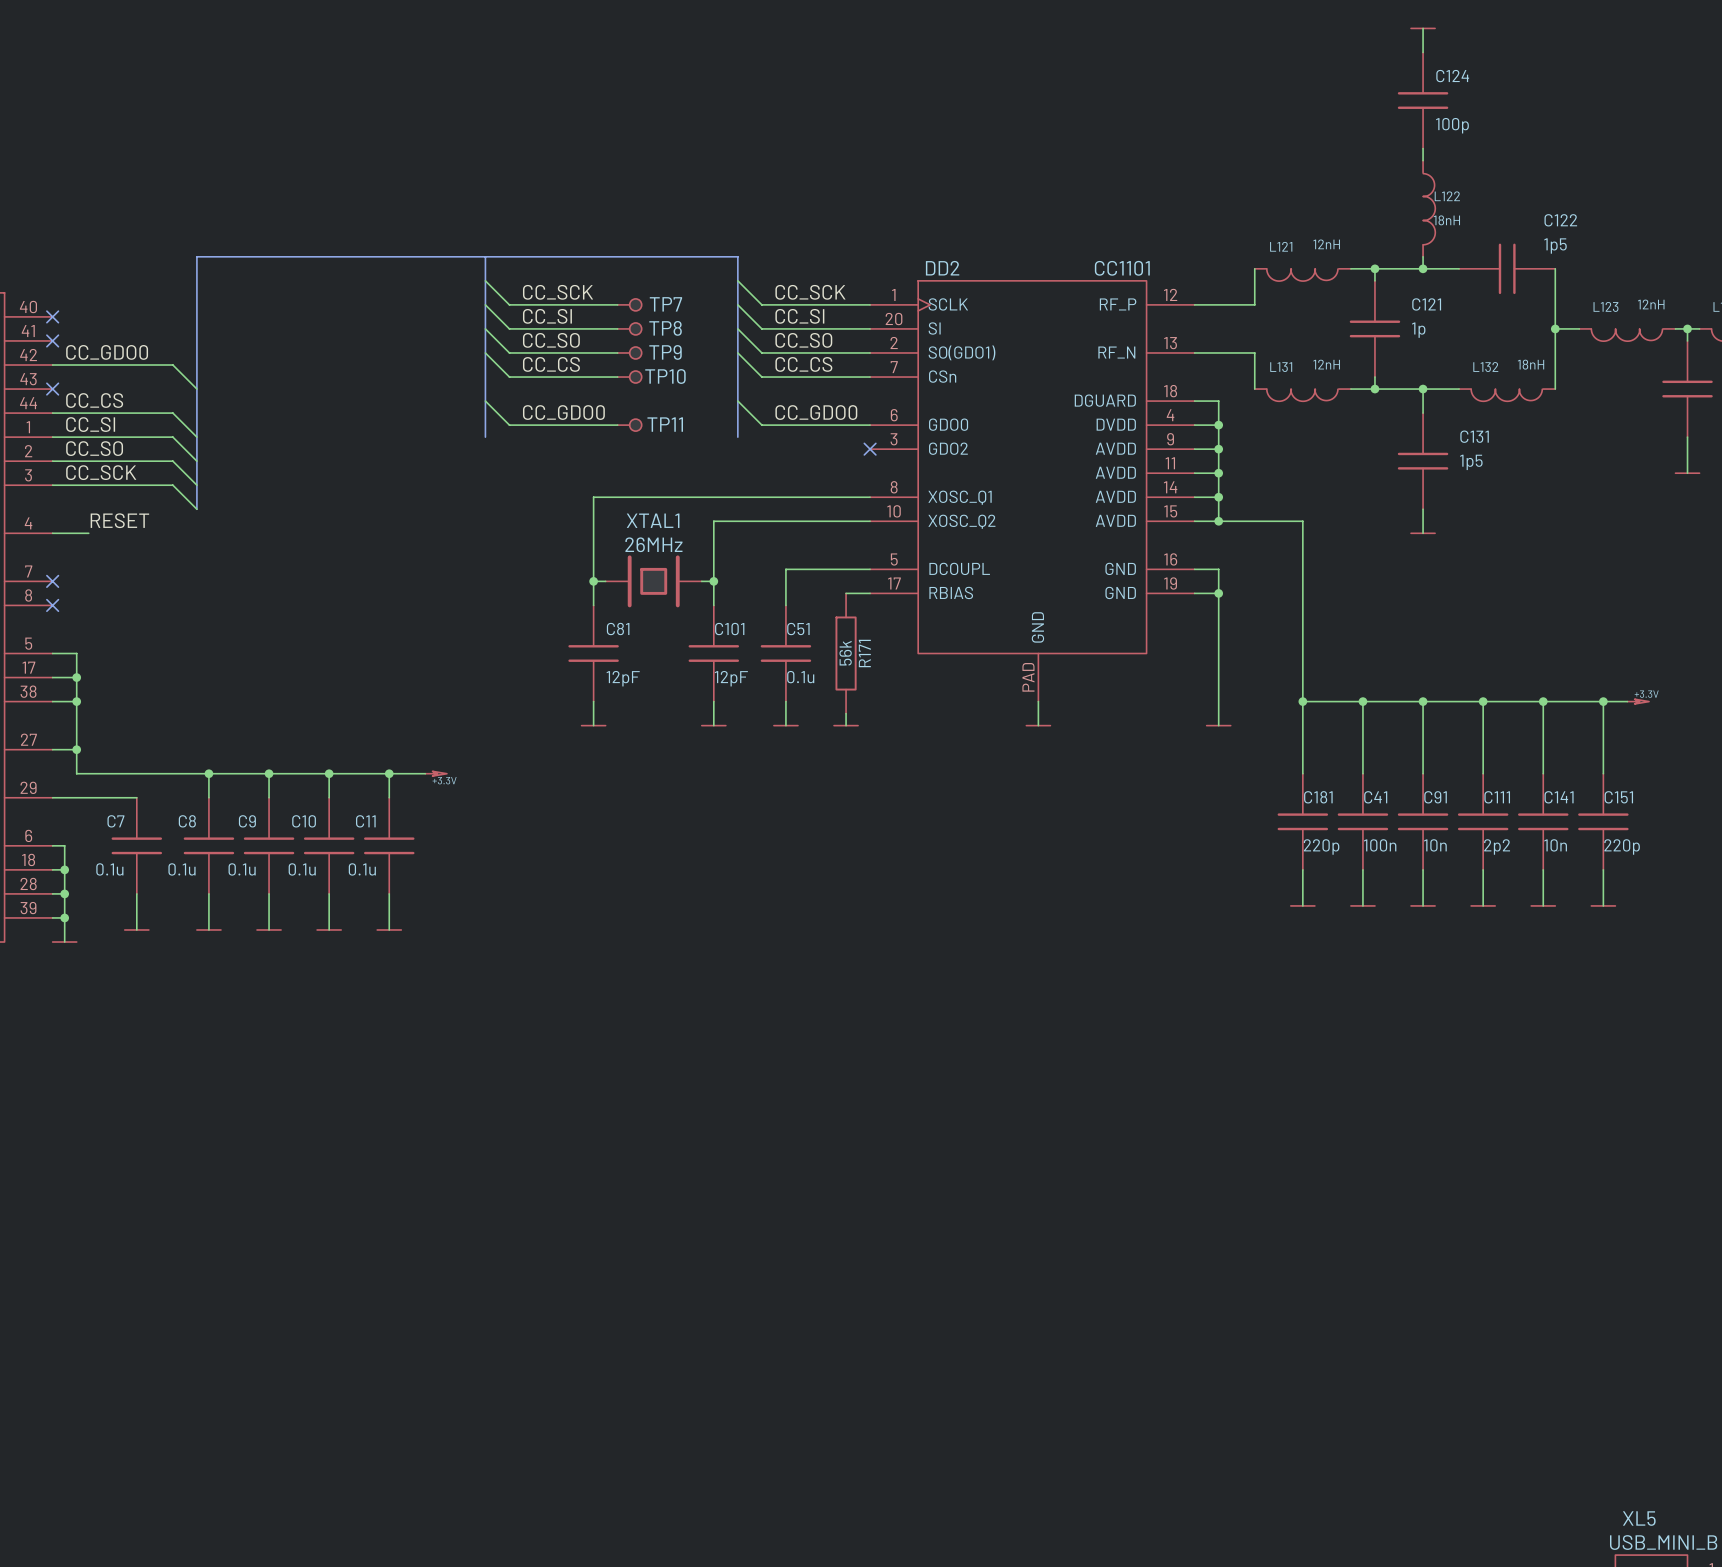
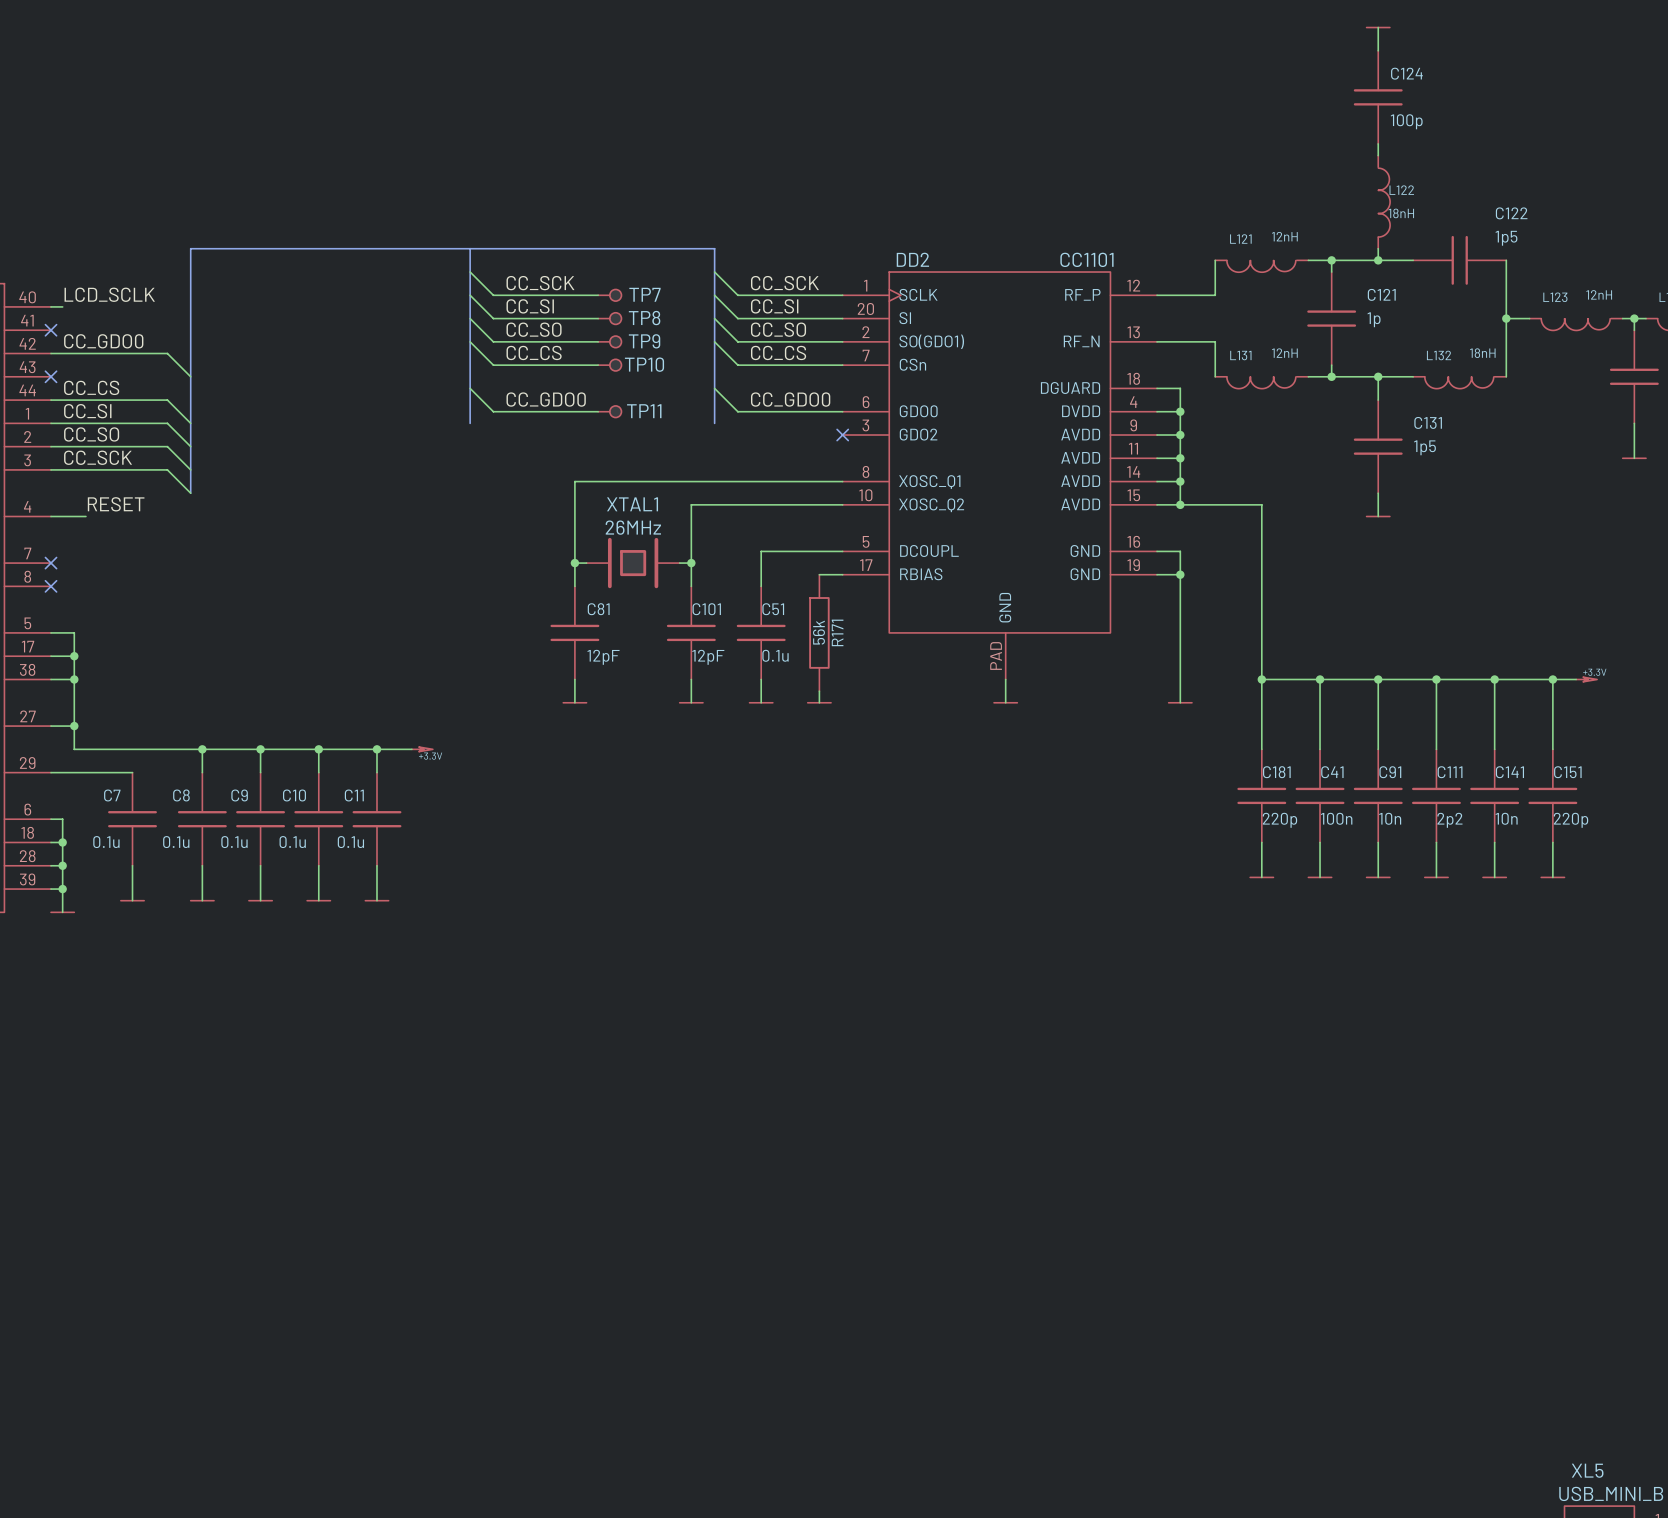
label: none -> LCD_SCLK (109, 294)
wire: none -> (51, 306) (62, 306)
no-connect mark: (52, 316) -> none

